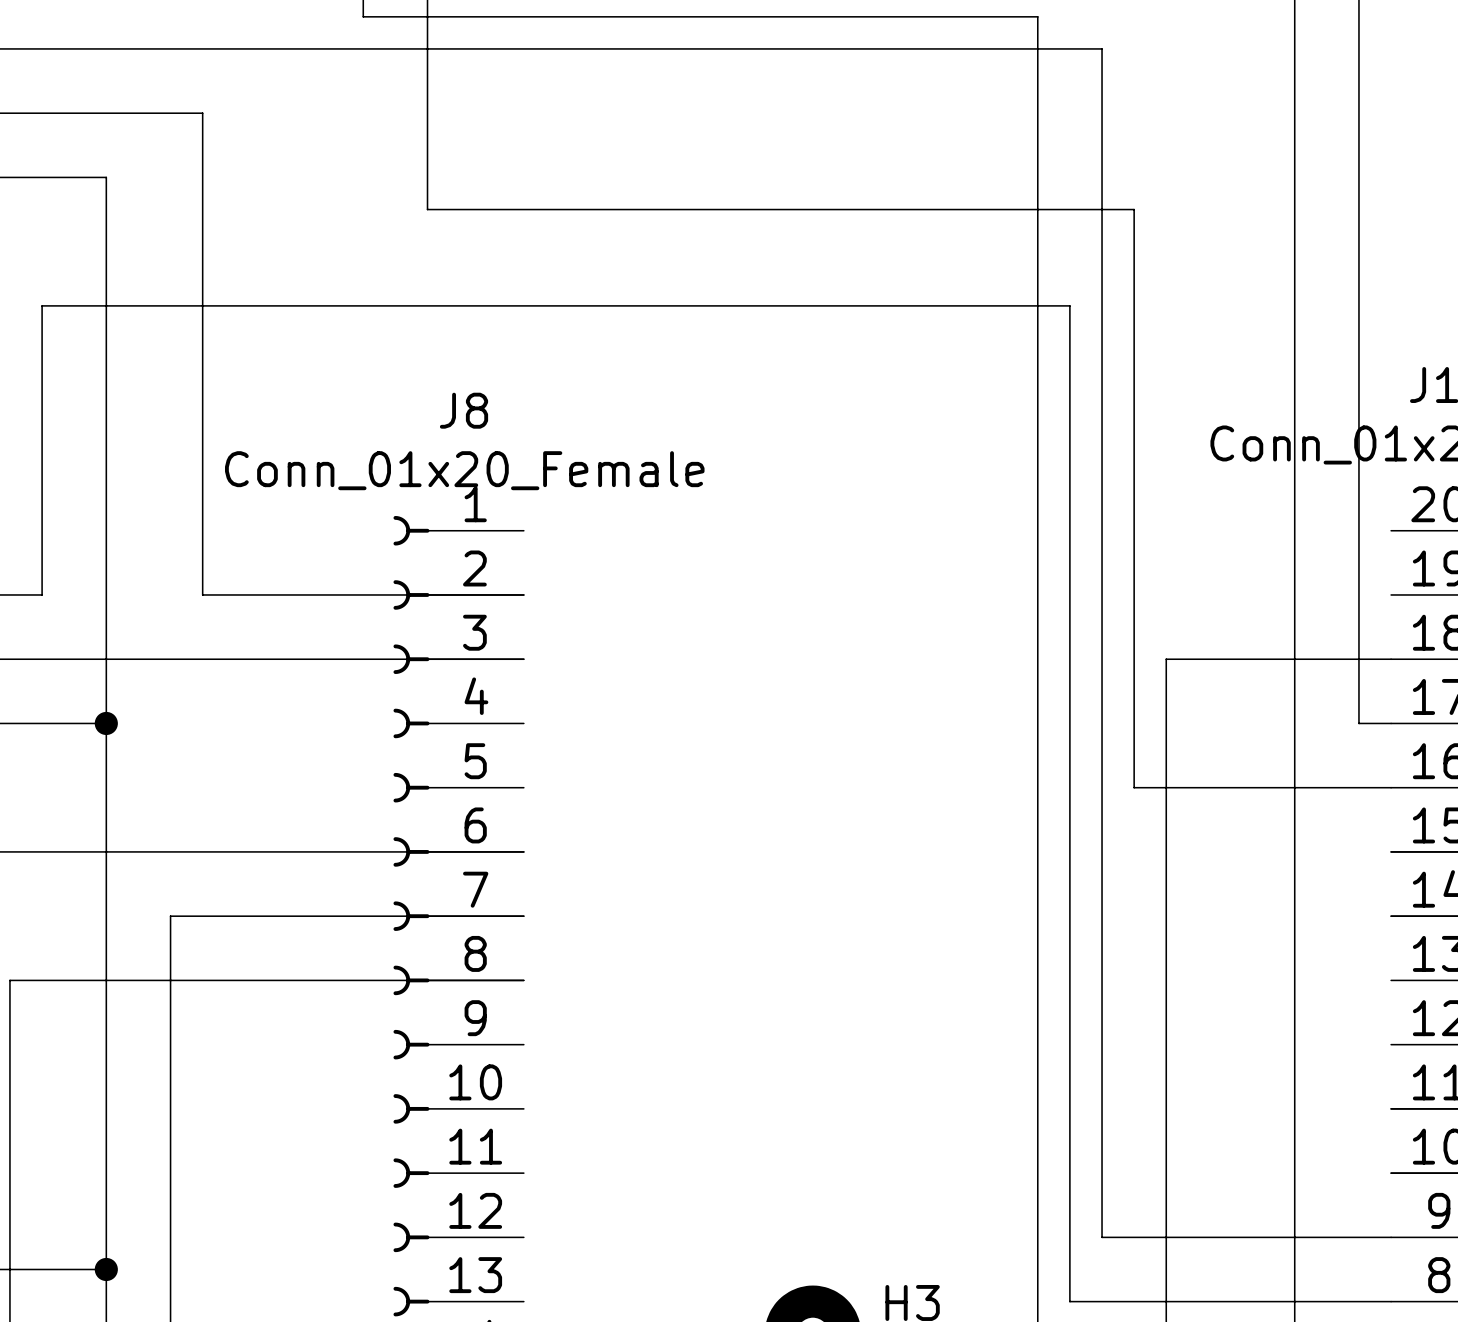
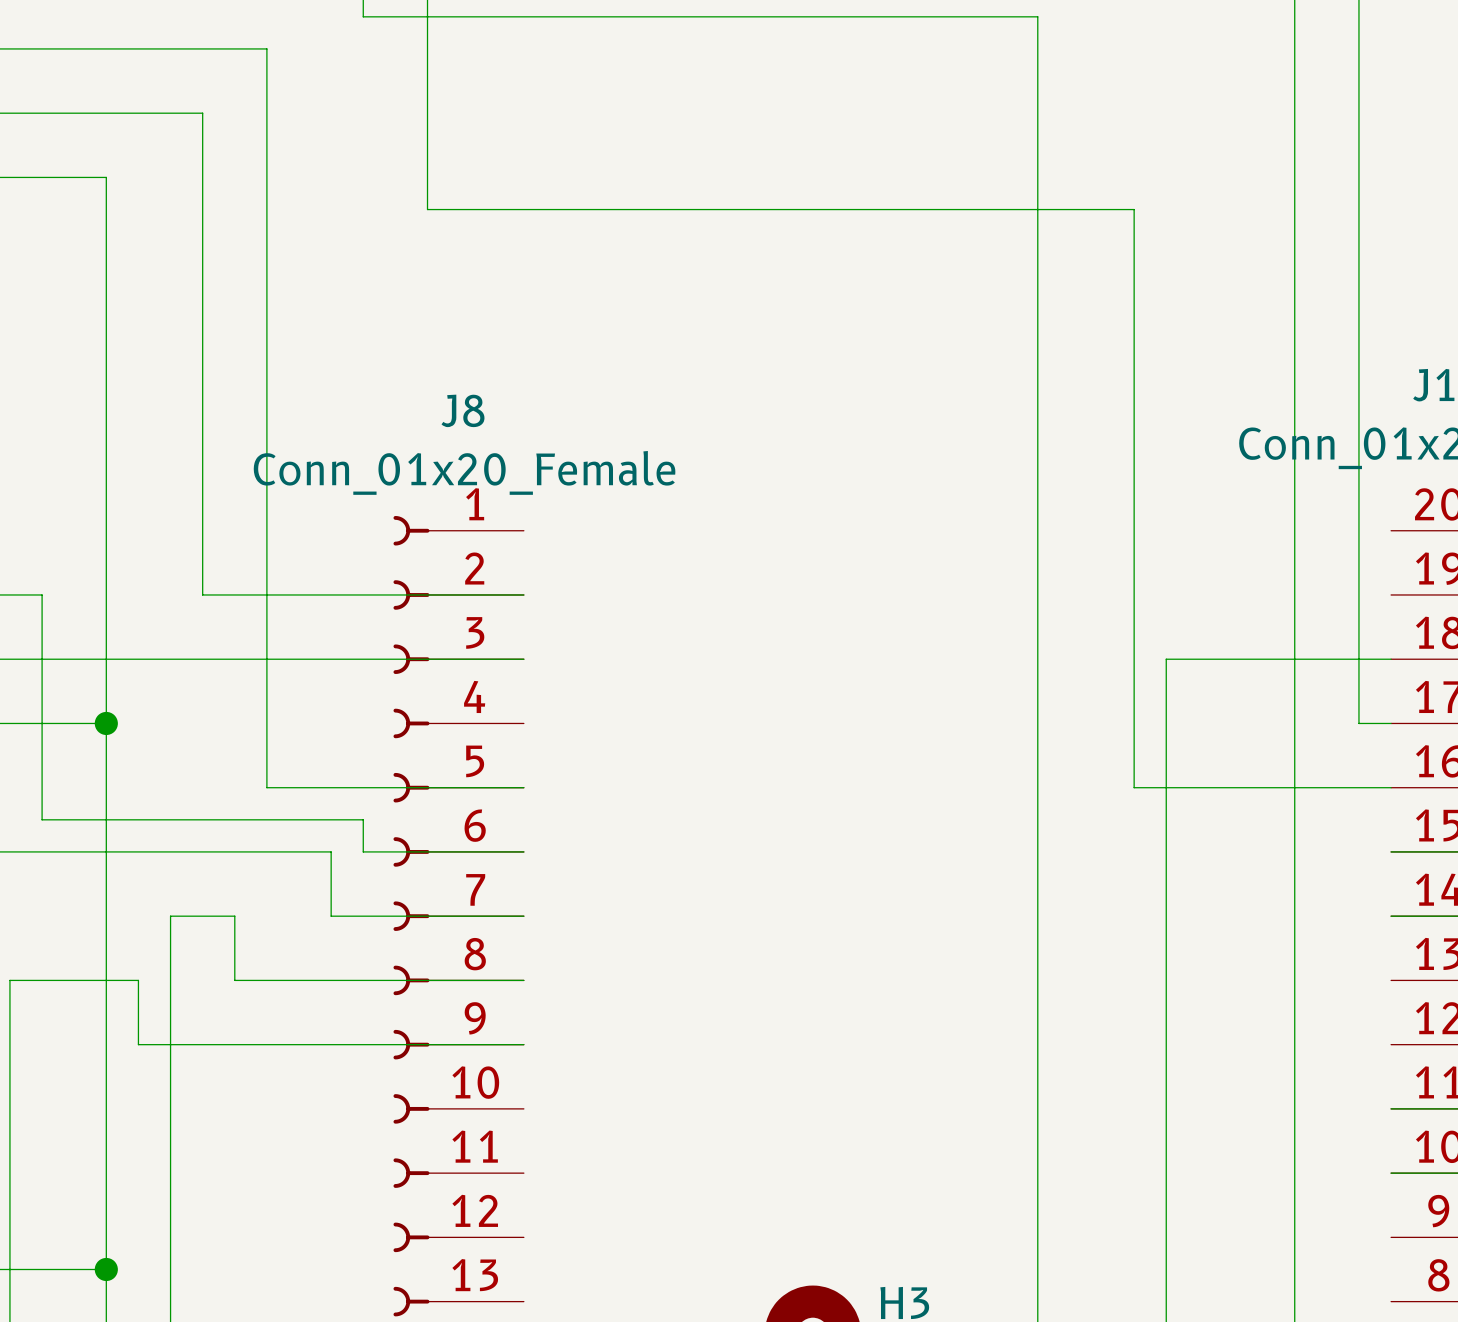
wire: (266, 48) (1102, 48) (1102, 1237) (1391, 1237) -> (266, 48) (266, 787) (523, 787)
wire: (42, 594) (42, 305) (1069, 305) (1069, 1301) (1391, 1301) -> (42, 594) (42, 819) (363, 819) (363, 851)
wire: (331, 851) (363, 851) -> (331, 851) (331, 916)
wire: (234, 916) (331, 916) -> (234, 916) (234, 980)
wire: (138, 980) (234, 980) -> (138, 980) (138, 1044) (523, 1044)

